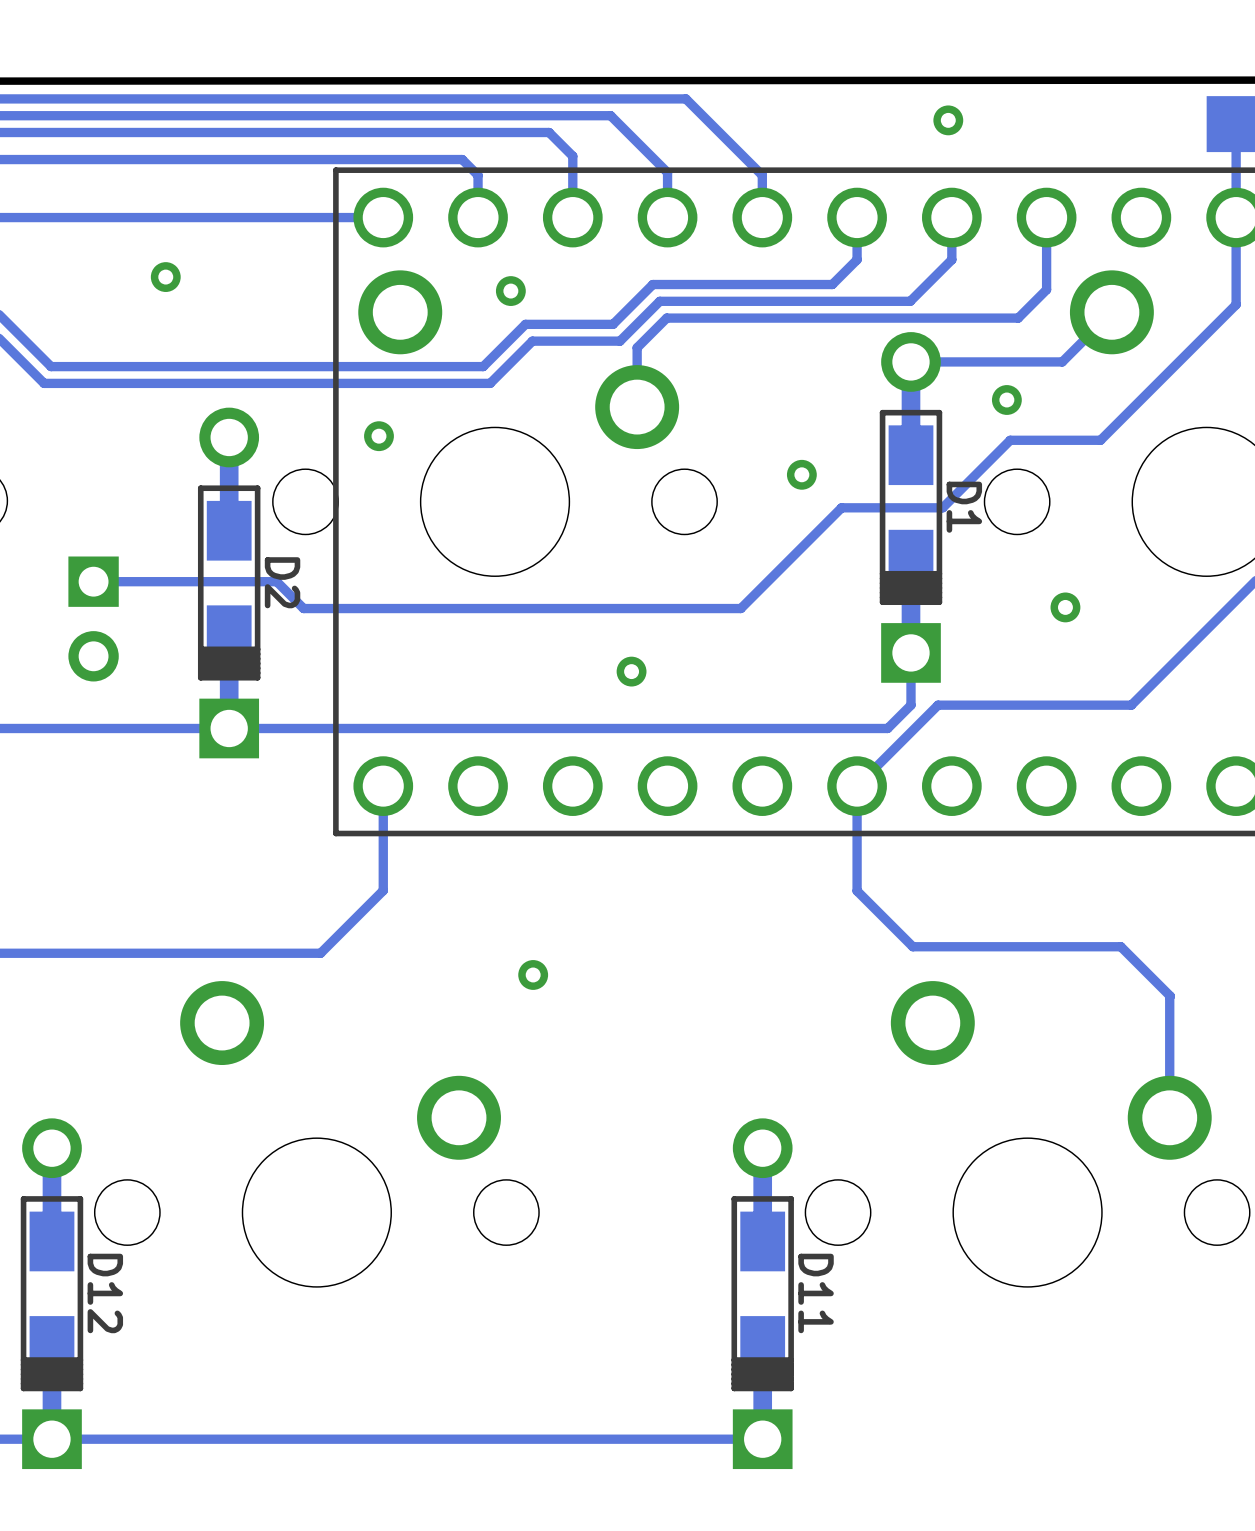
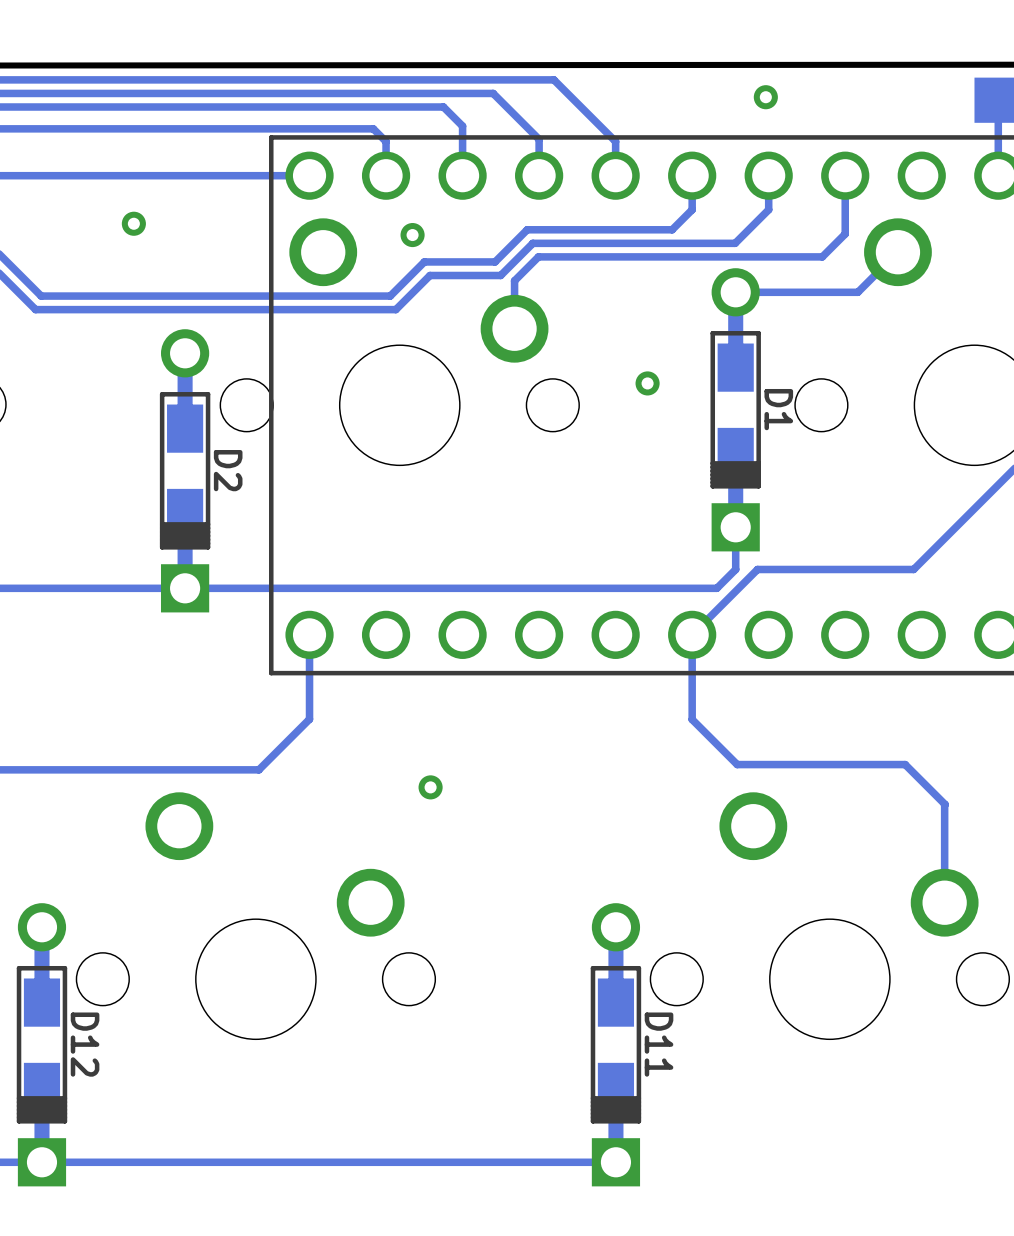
track: (1236, 217) (1236, 304) (1100, 440) (1010, 440) (942, 507) (841, 507) (740, 608) (303, 608) (276, 581) (93, 581) -> none
via: (1006, 399) -> none
via: (378, 436) -> none
via: (1065, 607) -> none
part: (93, 618) -> none
via: (631, 671) -> none

